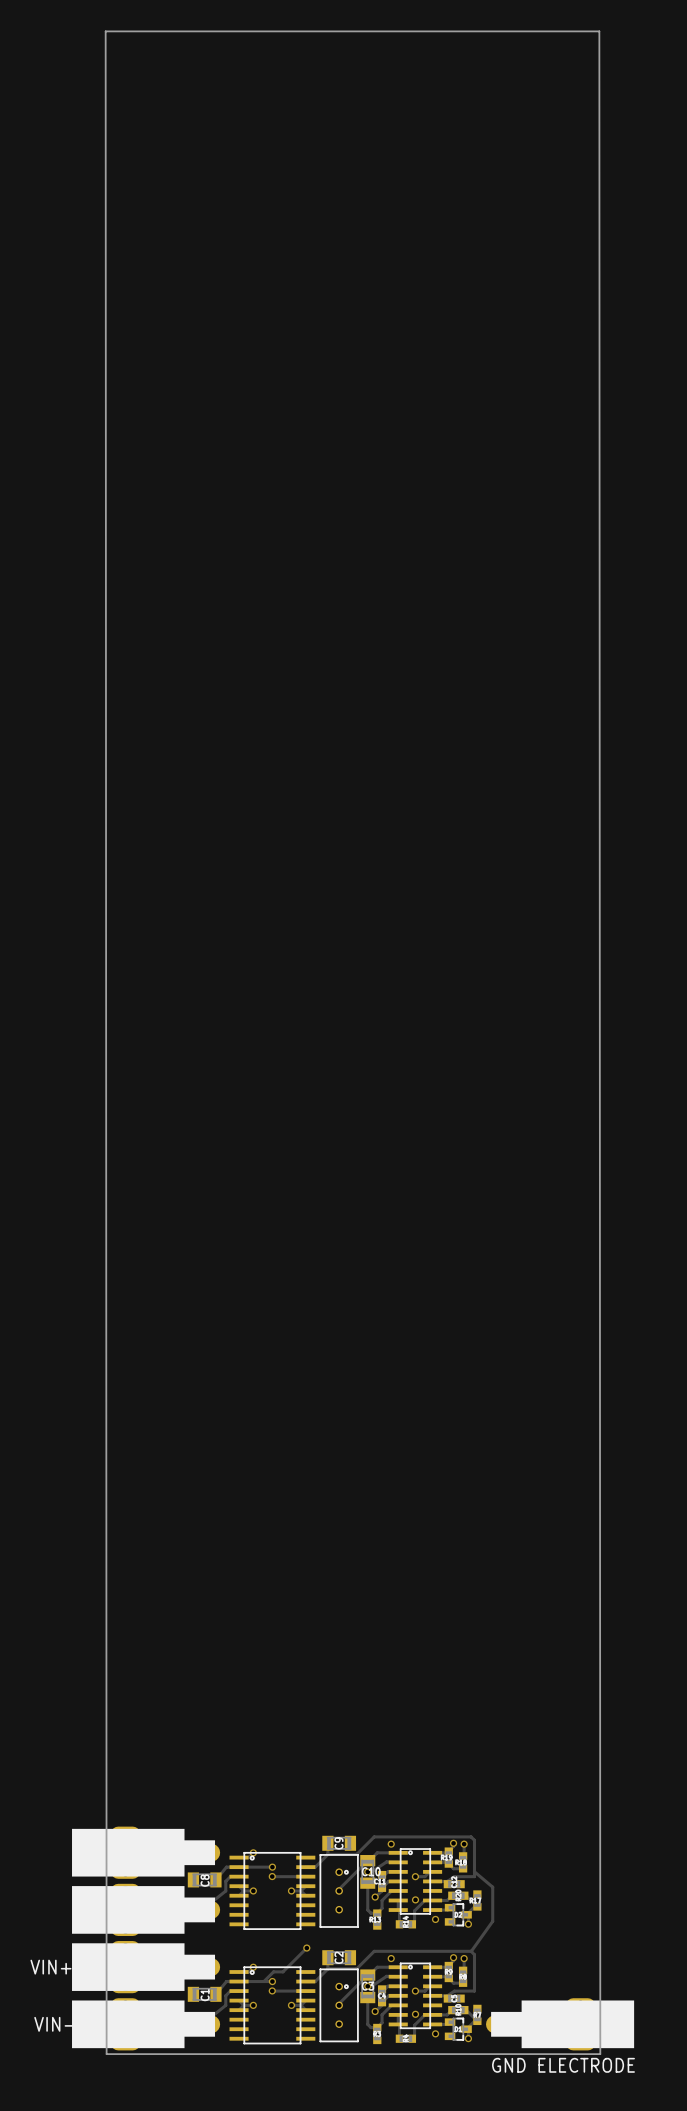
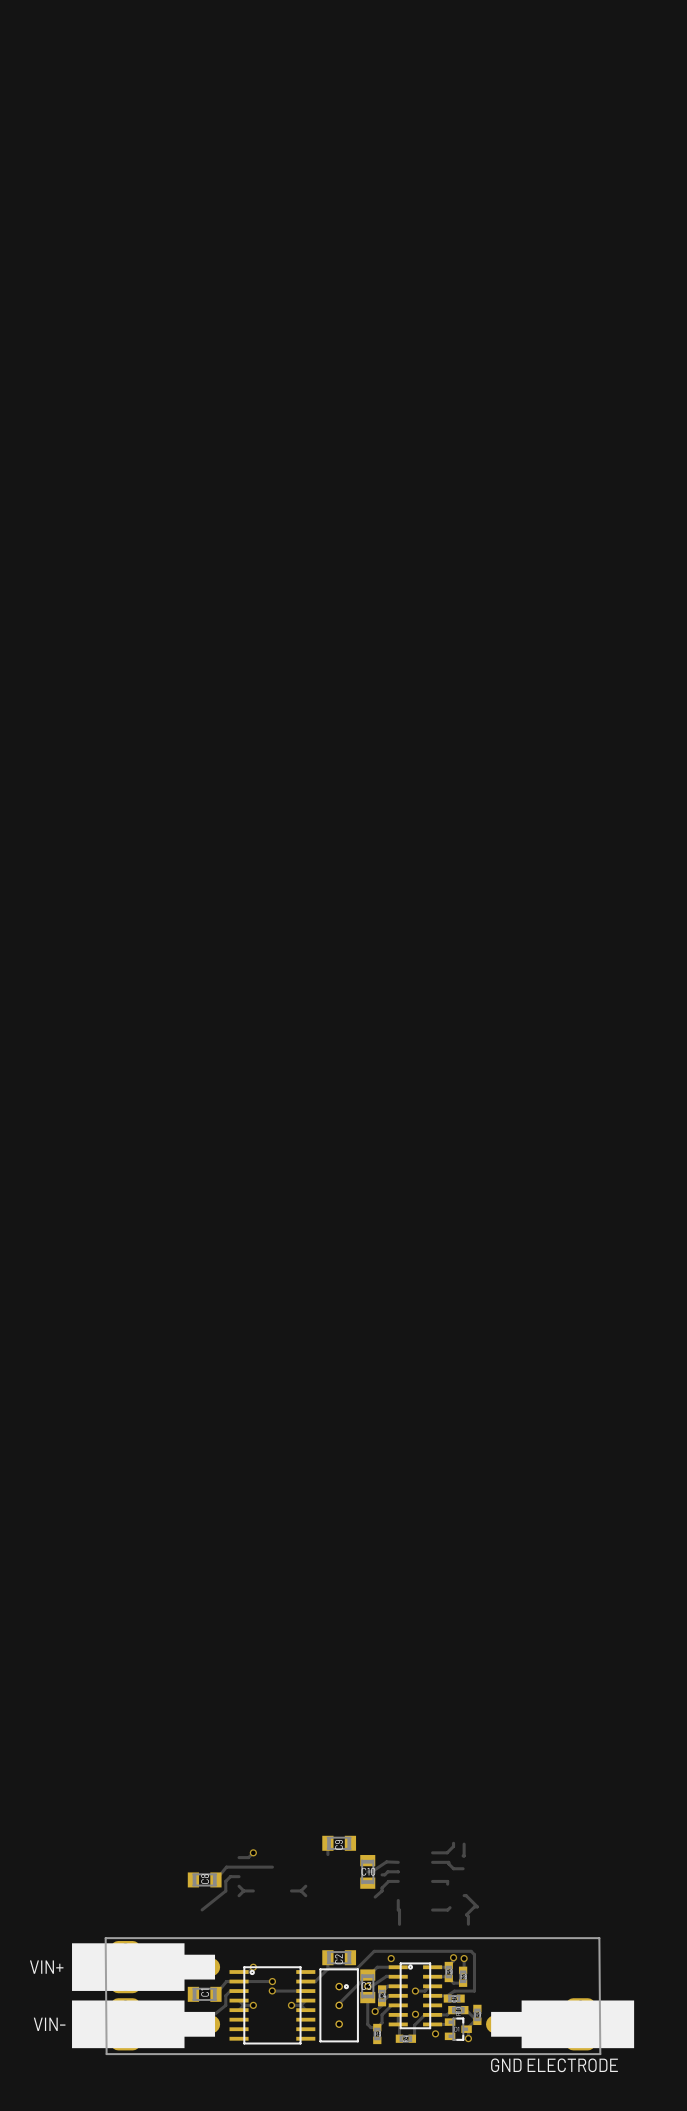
via: (453, 1843) -> none
via: (391, 1844) -> none
via: (464, 1844) -> none
part: (146, 1852) -> none
track: (398, 1852) (377, 1852) (339, 1890) -> none
part: (448, 1857) -> none
part: (463, 1862) -> none
via: (272, 1867) -> none
track: (305, 1867) (315, 1867) (328, 1854) (356, 1854) (374, 1836) (471, 1836) (474, 1840) (474, 1876) (454, 1876) (447, 1881) -> none
via: (367, 1871) -> none
track: (432, 1871) (429, 1871) (424, 1876) (415, 1876) -> none
track: (474, 1871) (492, 1887) (492, 1921) (471, 1951) -> none
track: (272, 1876) (305, 1876) -> none
via: (272, 1876) -> none
via: (415, 1876) -> none
part: (382, 1881) -> none
part: (415, 1881) -> none
track: (367, 1883) (367, 1910) (370, 1913) (377, 1913) (382, 1908) (382, 1900) (391, 1890) (398, 1890) -> none
part: (454, 1884) -> none
via: (253, 1890) -> none
part: (272, 1890) -> none
via: (291, 1890) -> none
part: (339, 1890) -> none
track: (451, 1895) (447, 1900) (424, 1900) (414, 1910) (414, 1922) (412, 1924) -> none
part: (458, 1895) -> none
via: (375, 1897) -> none
via: (415, 1899) -> none
part: (477, 1900) -> none
part: (146, 1909) -> none
part: (458, 1914) -> none
part: (377, 1919) -> none
via: (435, 1919) -> none
part: (405, 1924) -> none
via: (468, 1924) -> none
track: (306, 1948) (282, 1971) (273, 1971) (263, 1981) -> none
via: (306, 1948) -> none
board edge: (106, 2054) (105, 31) (599, 31) (600, 2054) -> (106, 2054) (105, 1938) (599, 1938) (600, 2054)

